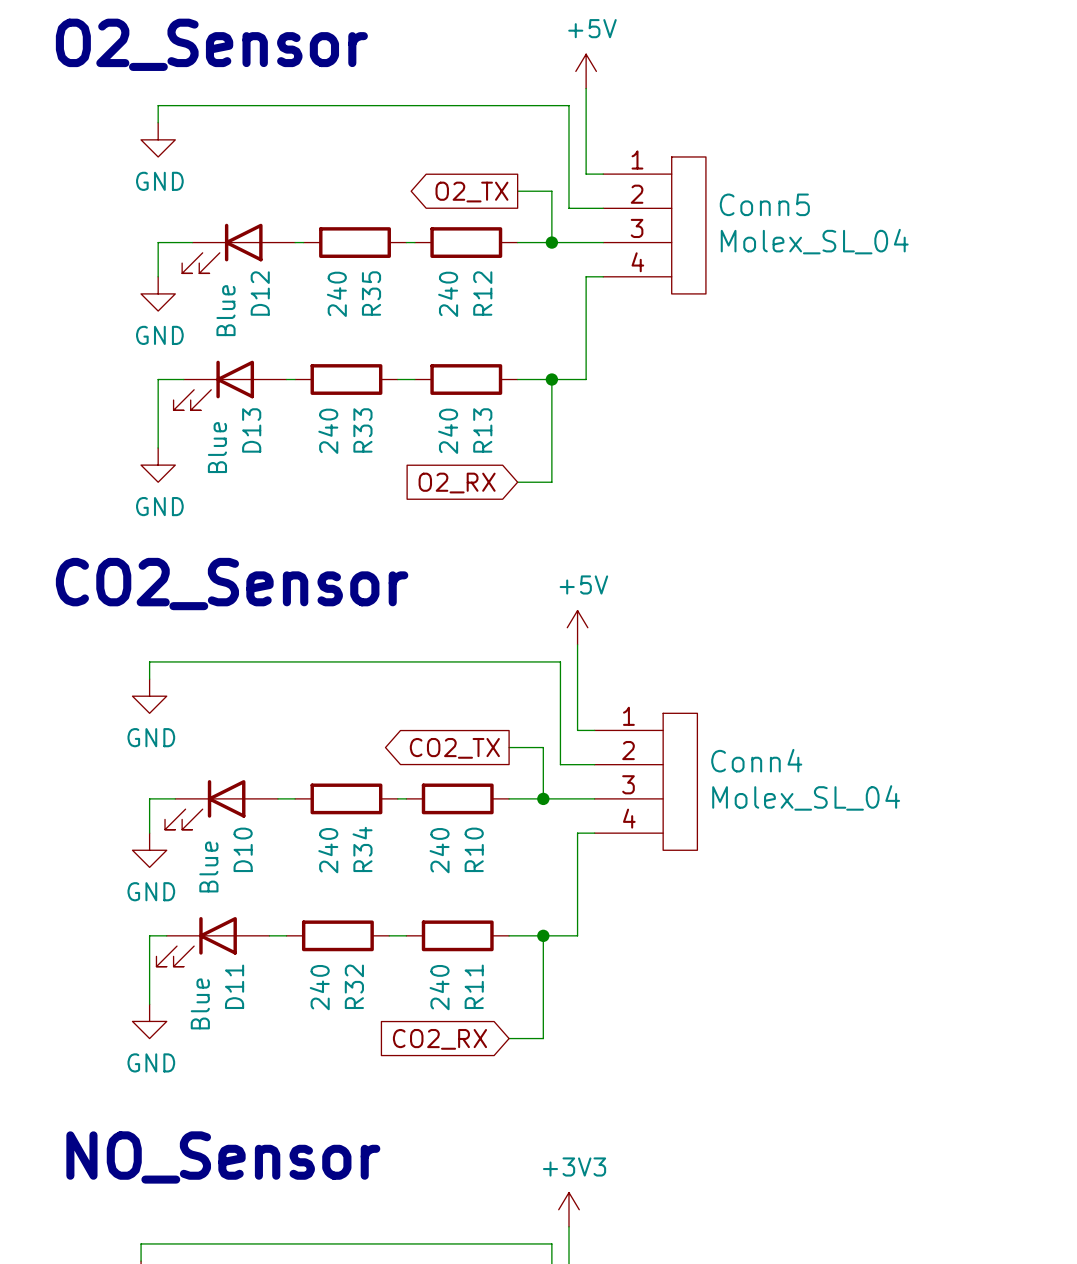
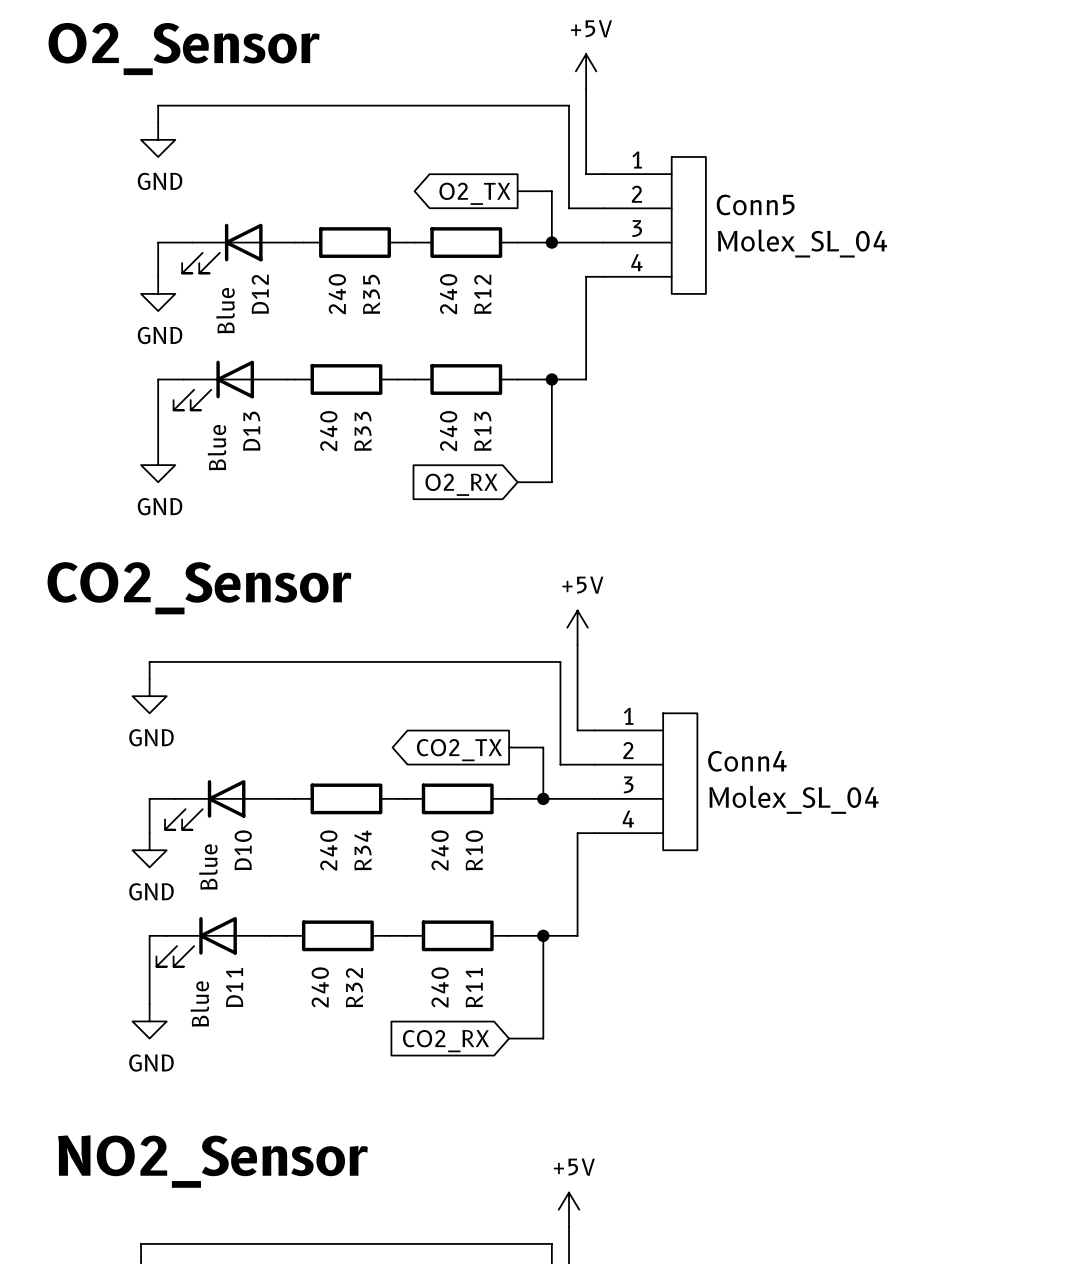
text: NO_Sensor (223, 1157) -> NO2_Sensor (212, 1161)
power symbol: +3V3 (569, 1209) -> +5V (569, 1209)

